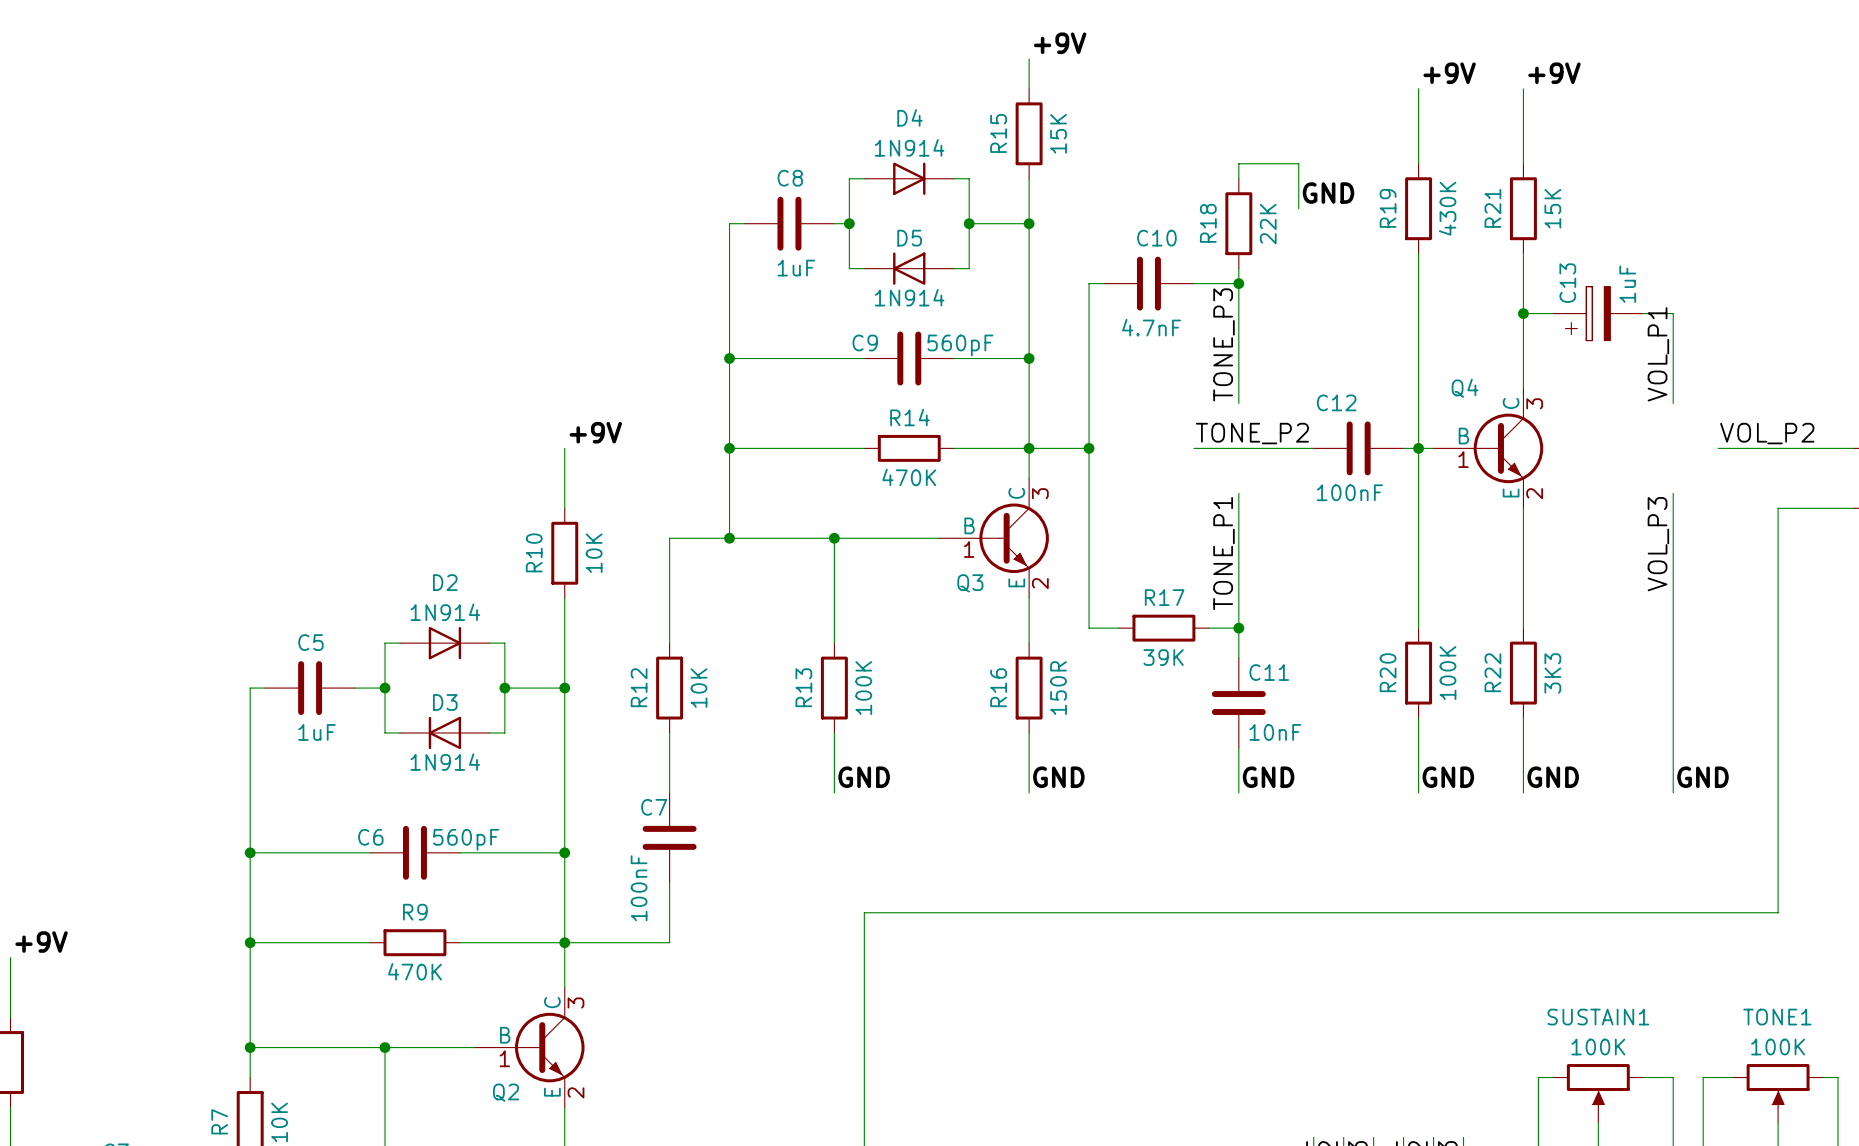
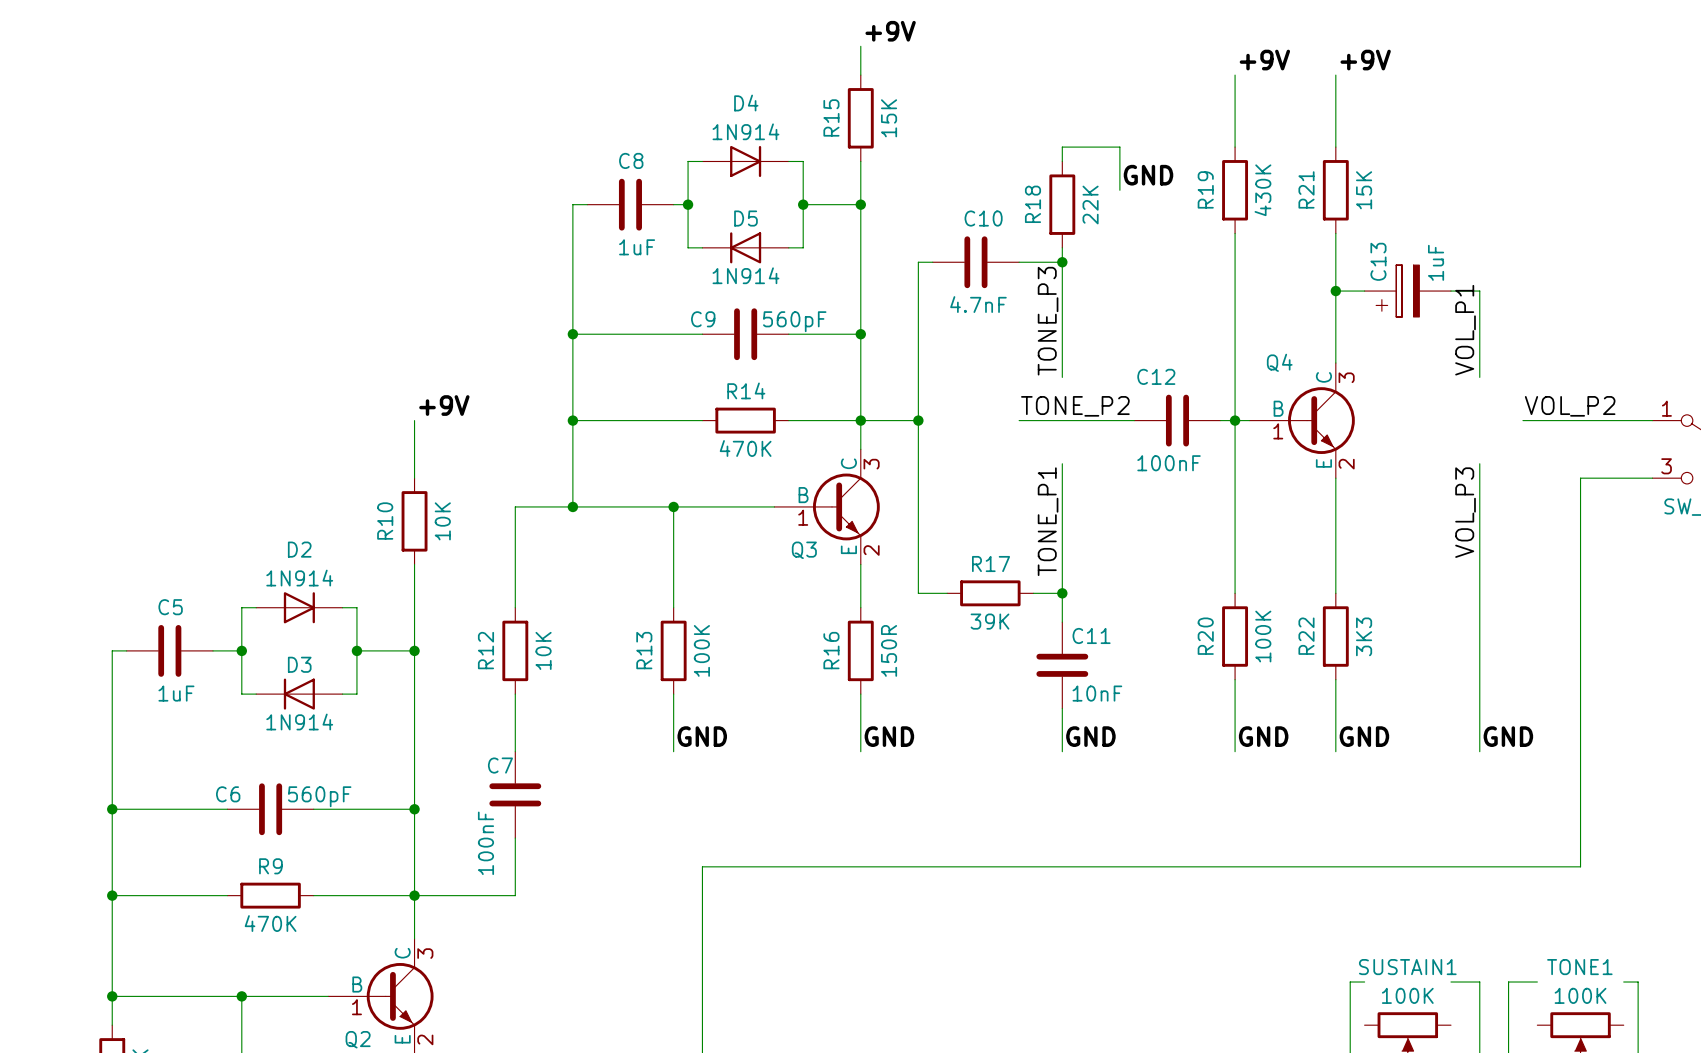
wire: (1538, 1077) (1553, 1077) -> (1350, 1025) (1350, 982) (1364, 982)
wire: (1643, 1077) (1673, 1077) -> (1450, 982) (1479, 982) (1479, 1025)
wire: (1703, 1077) (1733, 1077) -> (1508, 1025) (1508, 982) (1537, 982)
wire: (1823, 1077) (1838, 1077) -> (1623, 982) (1638, 982) (1638, 1025)

